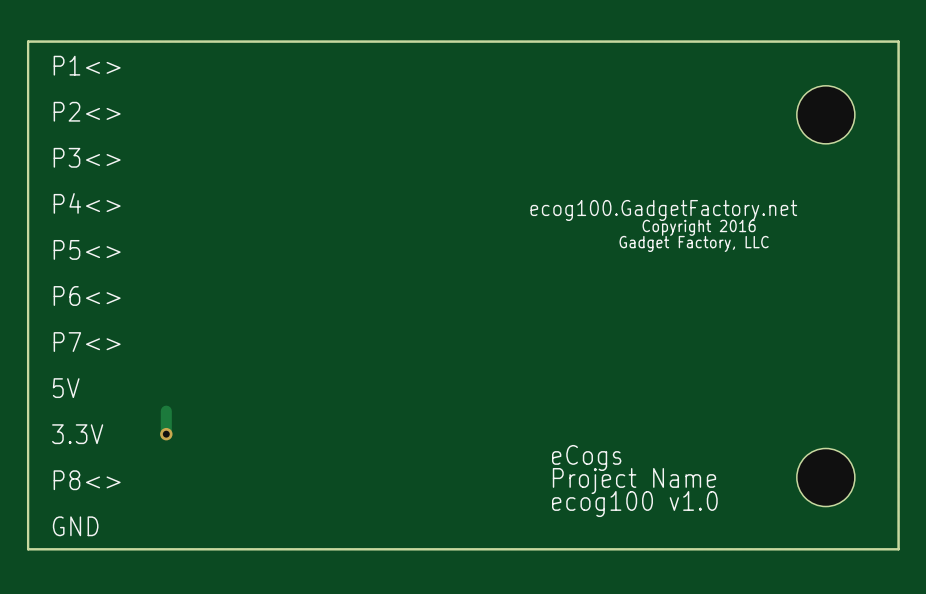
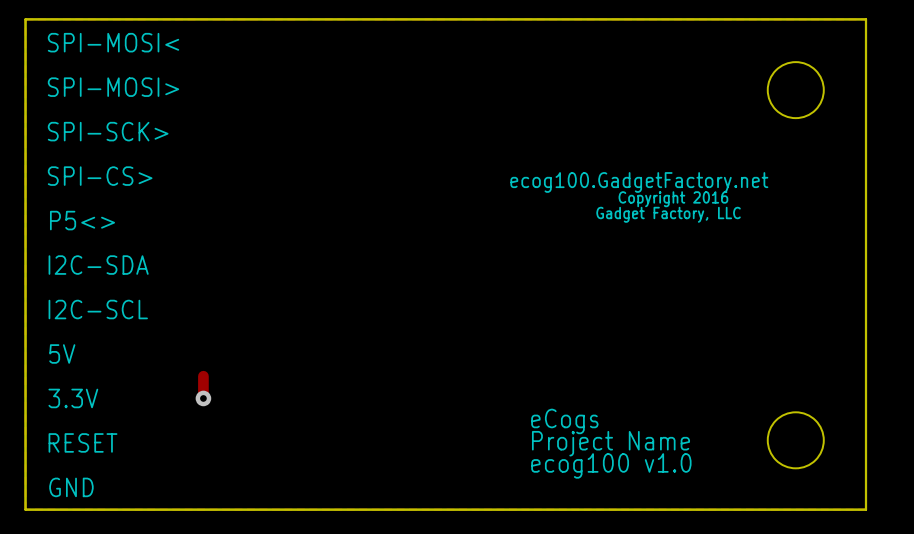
text: P1<> (87, 65) -> SPI-MOSI< (113, 42)
text: P2<> (87, 111) -> SPI-MOSI> (113, 87)
text: P3<> (87, 157) -> SPI-SCK> (108, 131)
text: P4<> (87, 203) -> SPI-CS> (100, 176)
text: P6<> (87, 295) -> I2C-SDA (98, 265)
text: P7<> (87, 342) -> I2C-SCL (98, 309)
track: (166, 411) (166, 434) -> (203, 376) (203, 398)
via: (166, 434) -> none
via: none -> (203, 398)
text: P8<> (87, 480) -> RESET (83, 442)

